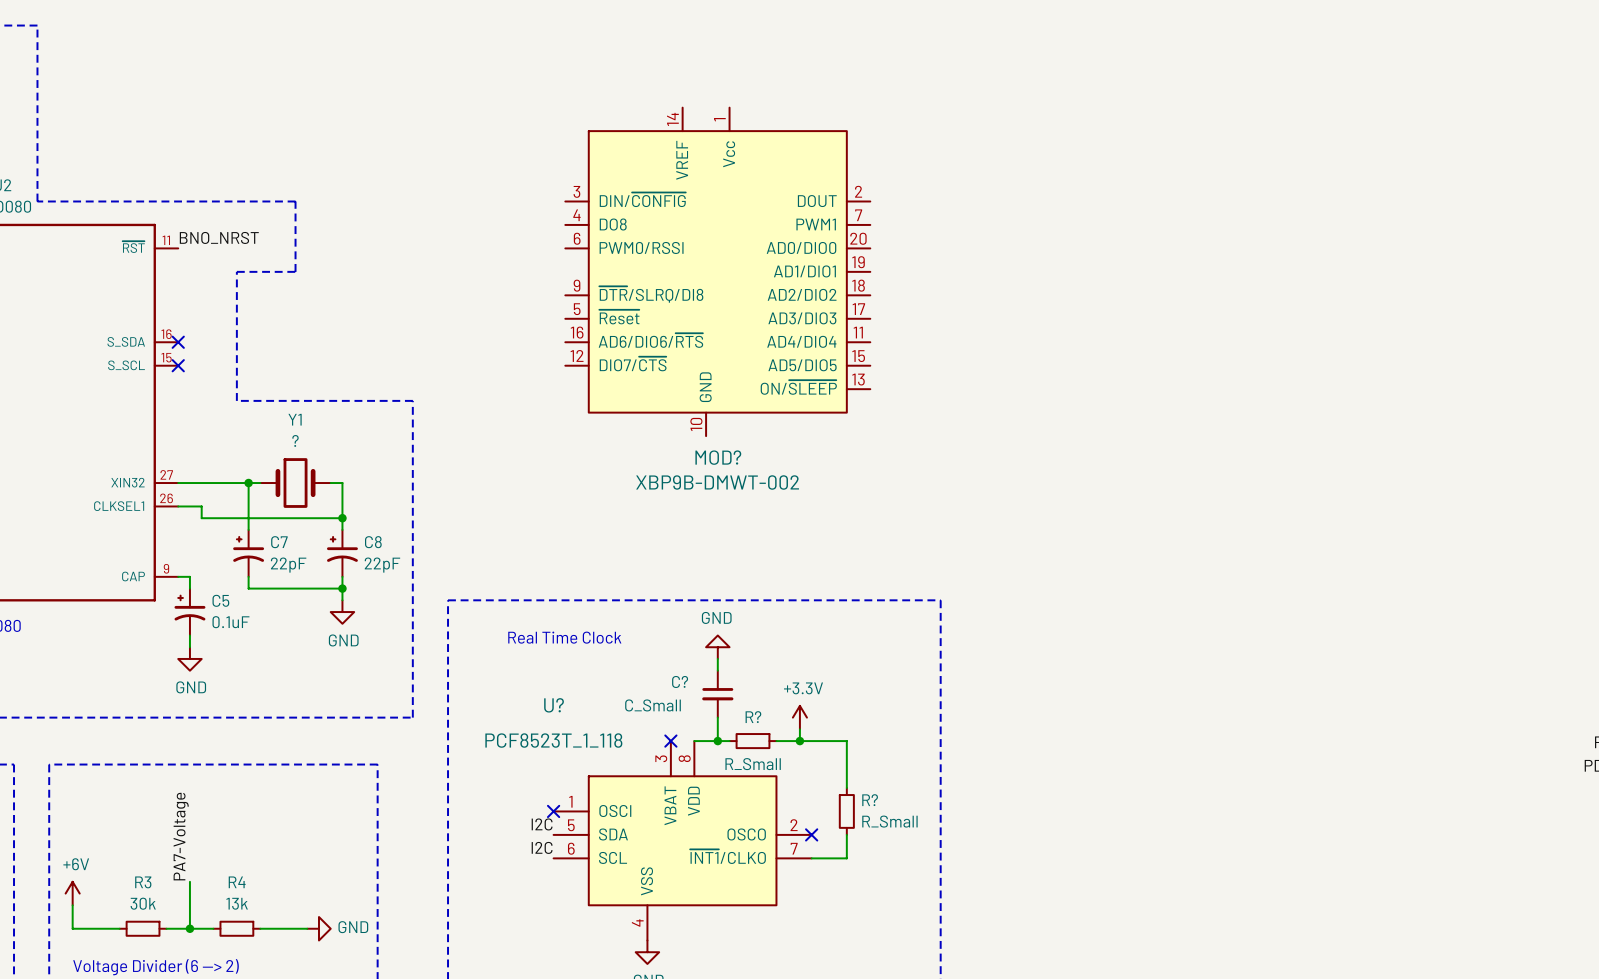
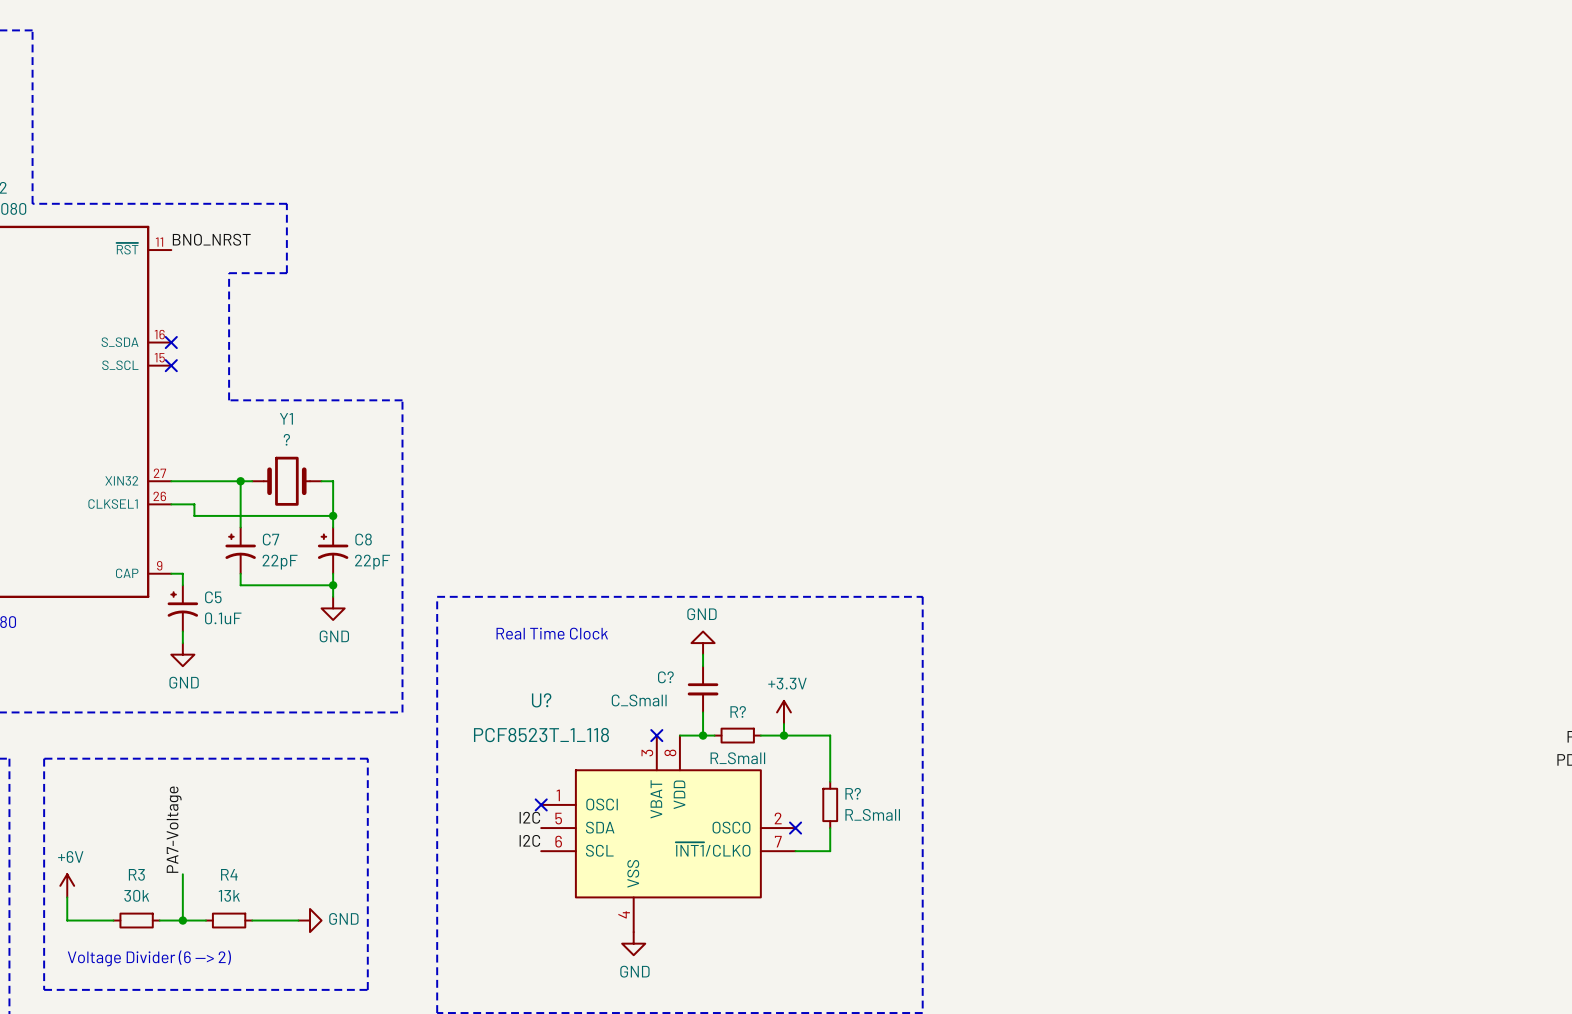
MOD?: XBP9B-DMWT-002 (717, 271) -> none

